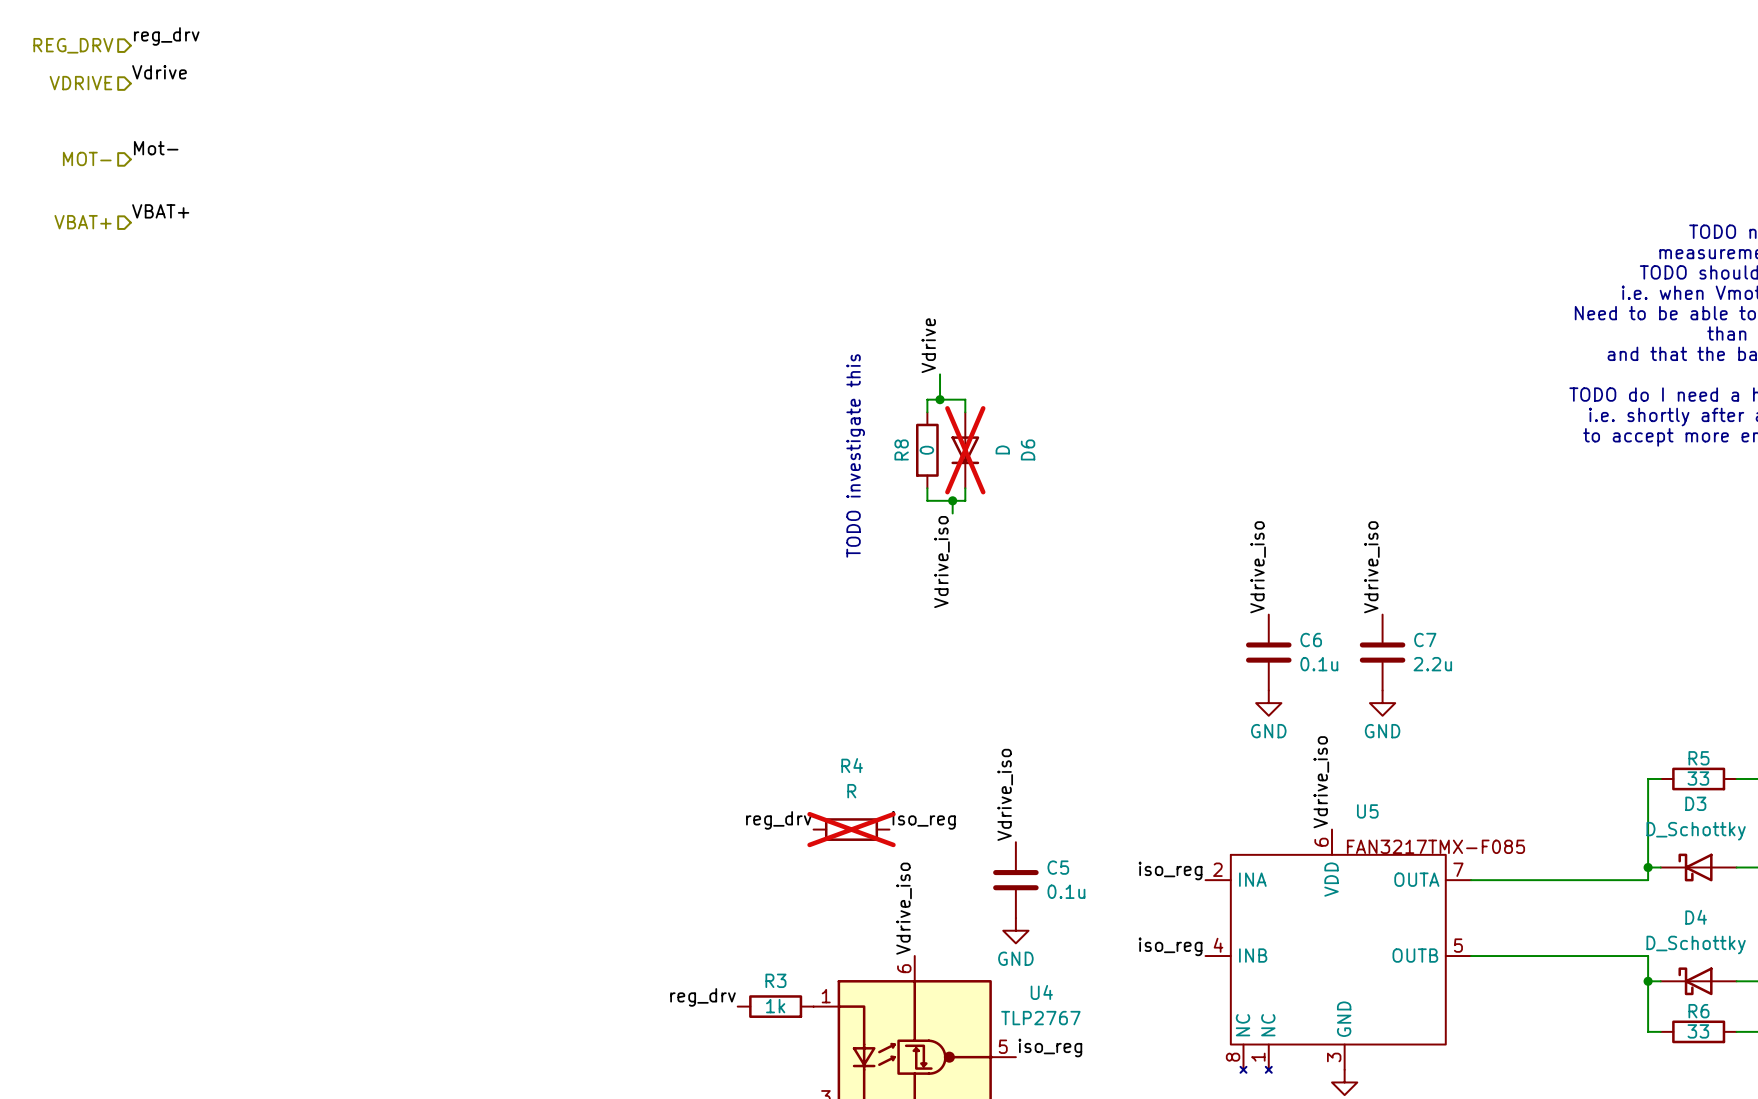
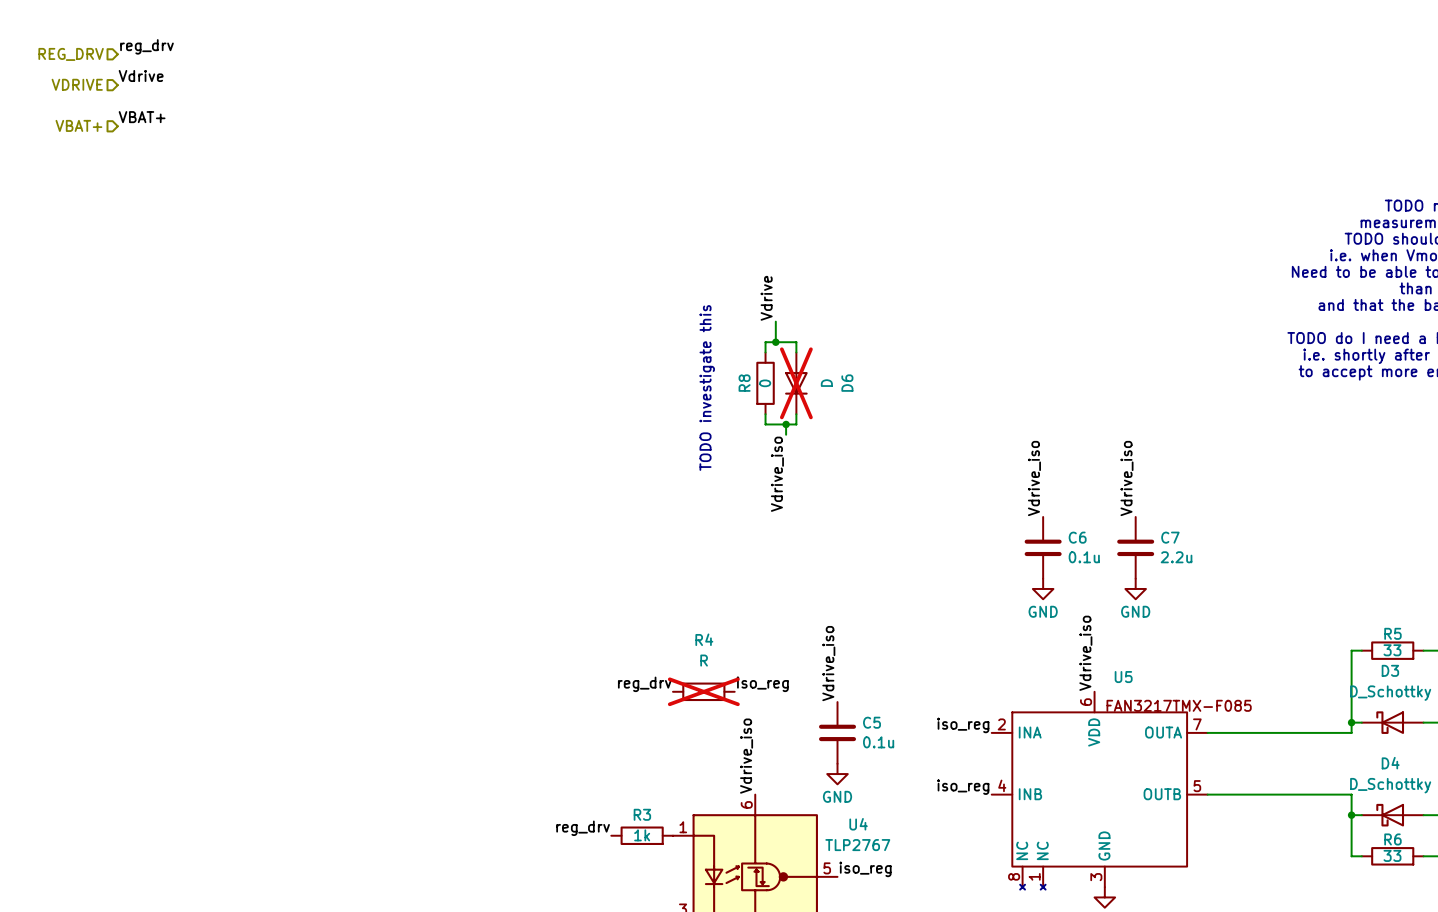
label: Mot- (156, 148) -> none
hierarchical label: MOT- (87, 158) -> none
label position: VBAT+ (160, 211) -> VBAT+ (142, 117)
hierarchical label position: VBAT+ (83, 222) -> VBAT+ (78, 125)

